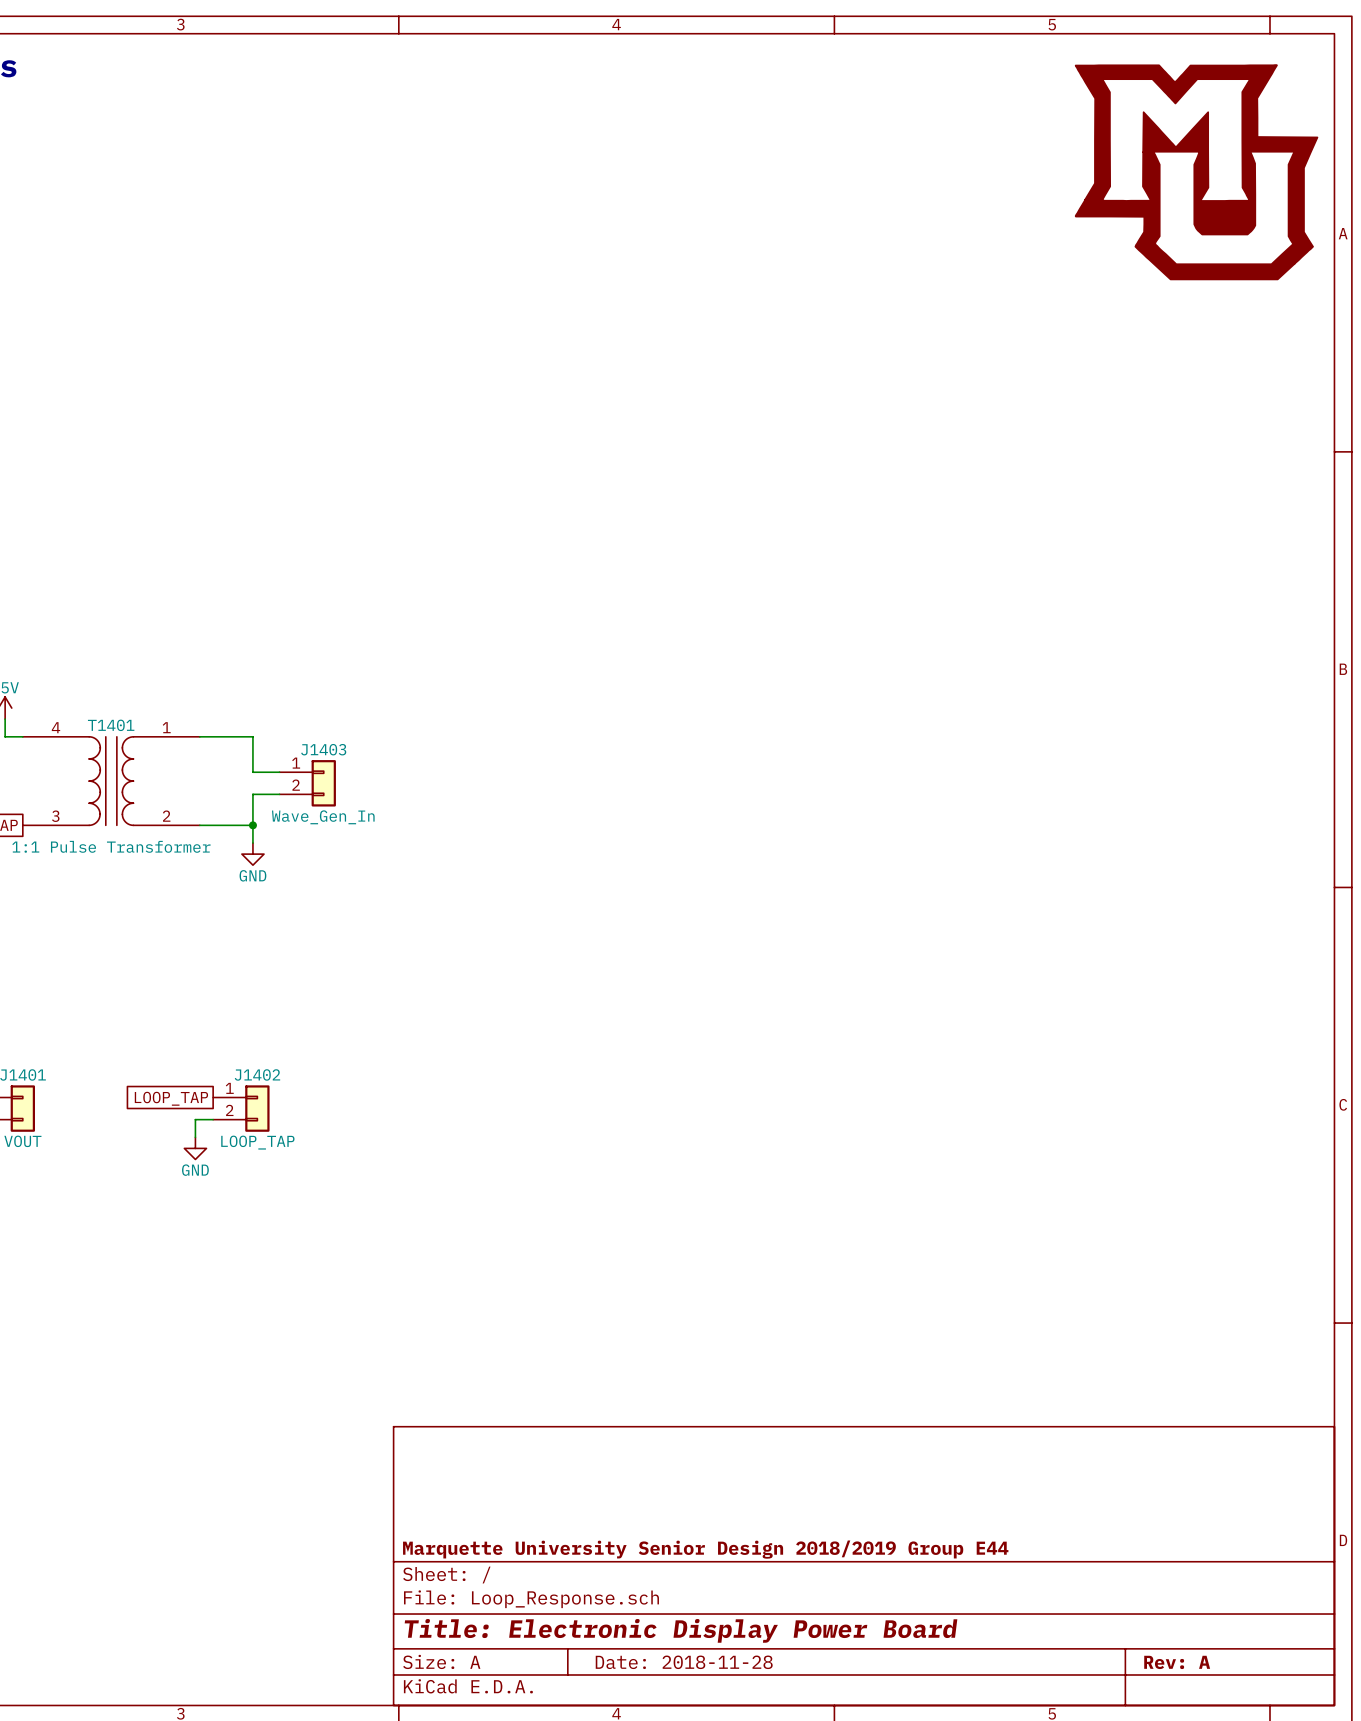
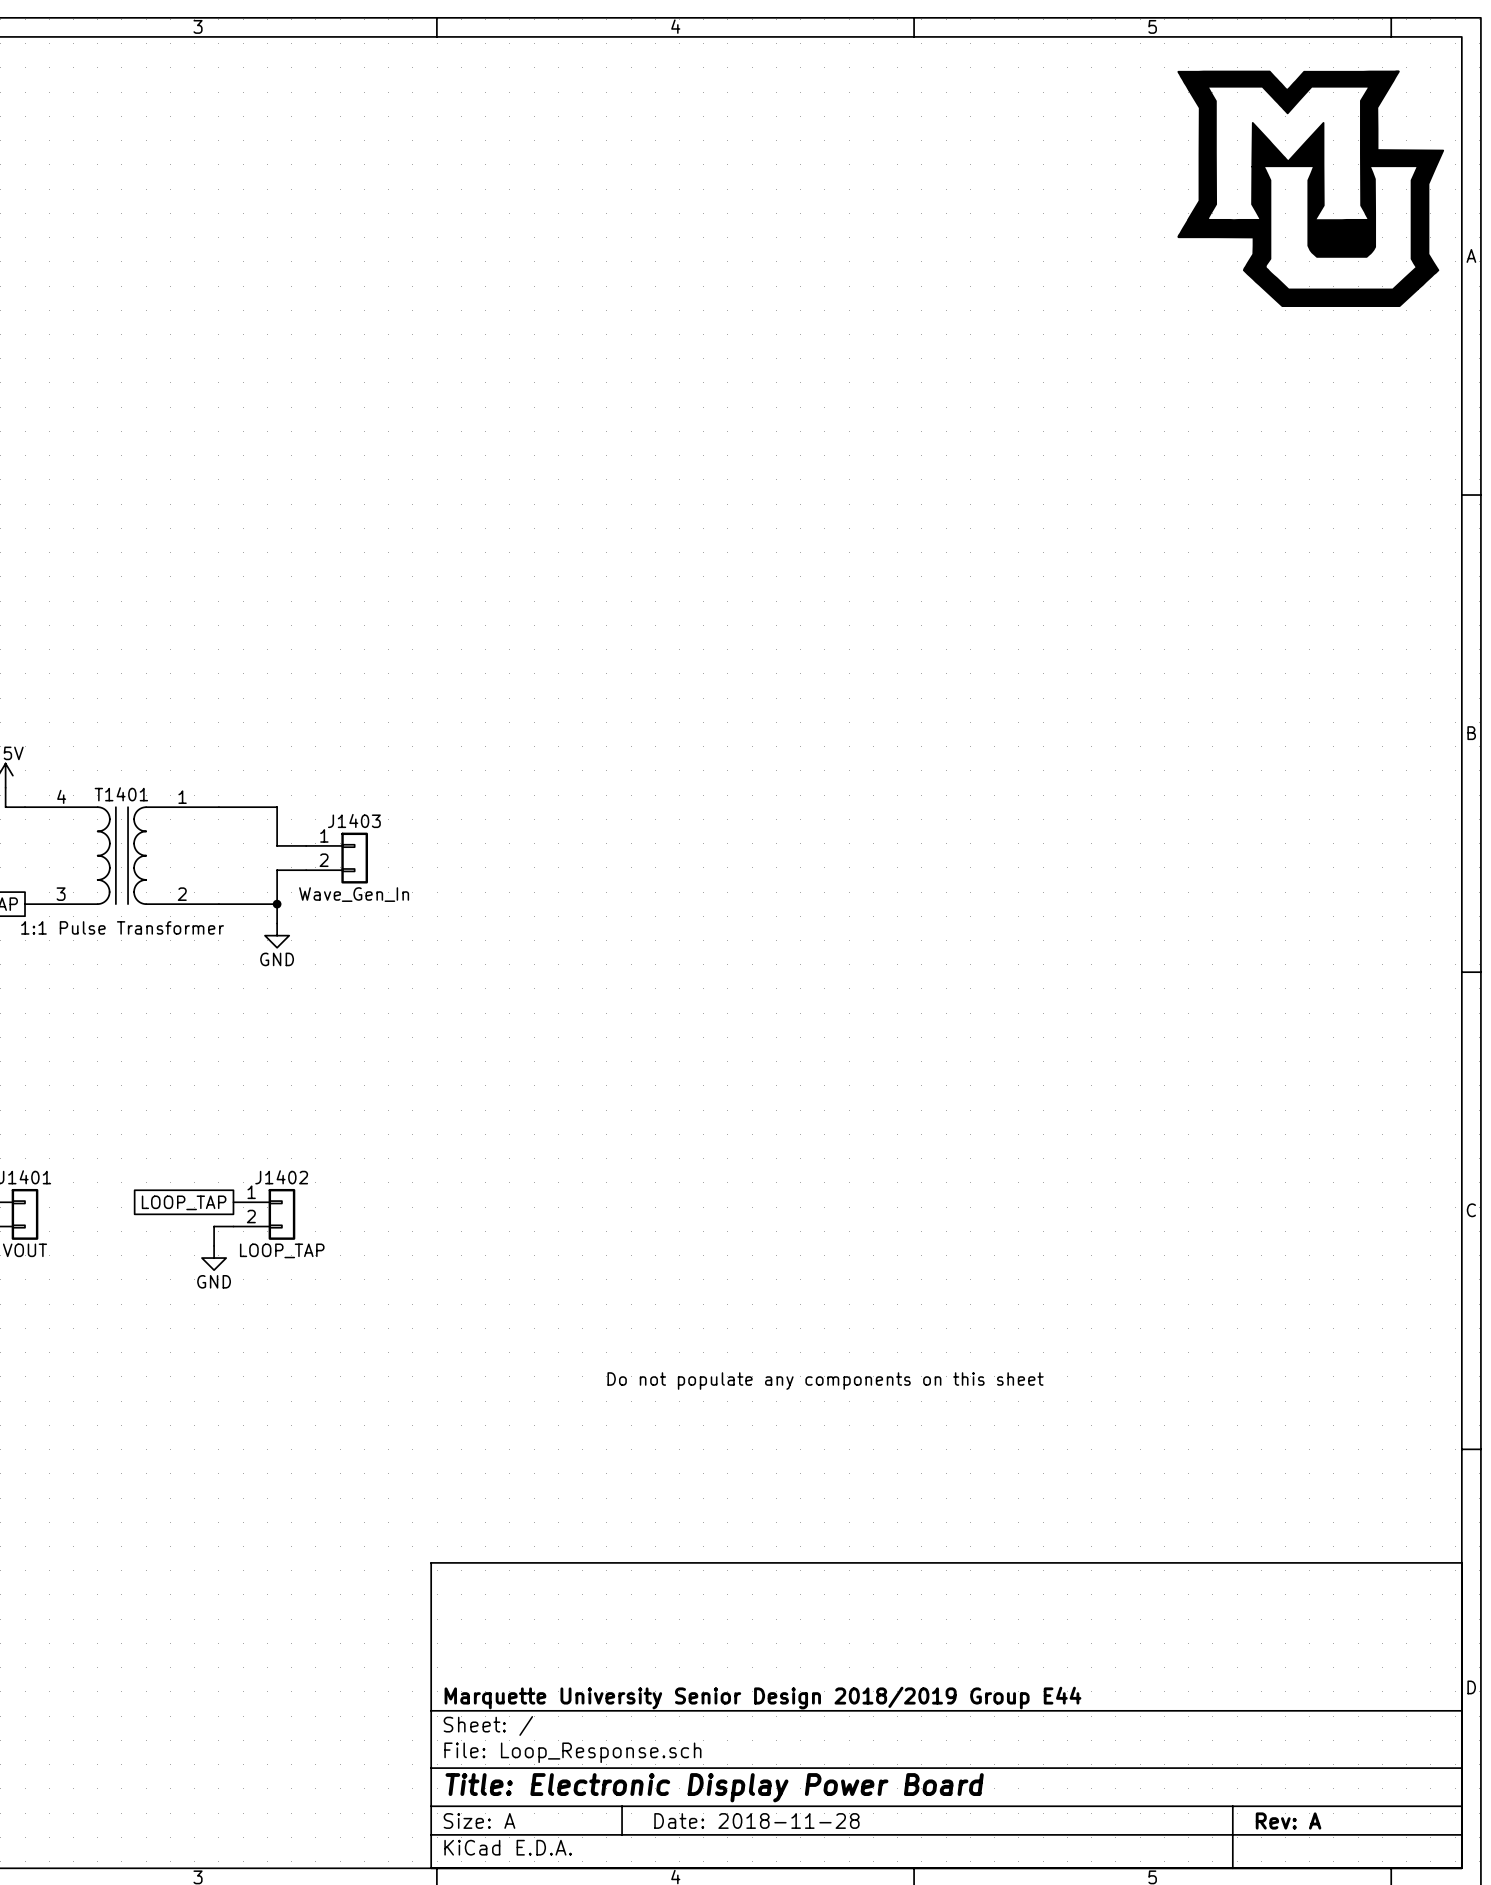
text: none -> Do not populate any components on this sheet (825, 1381)

